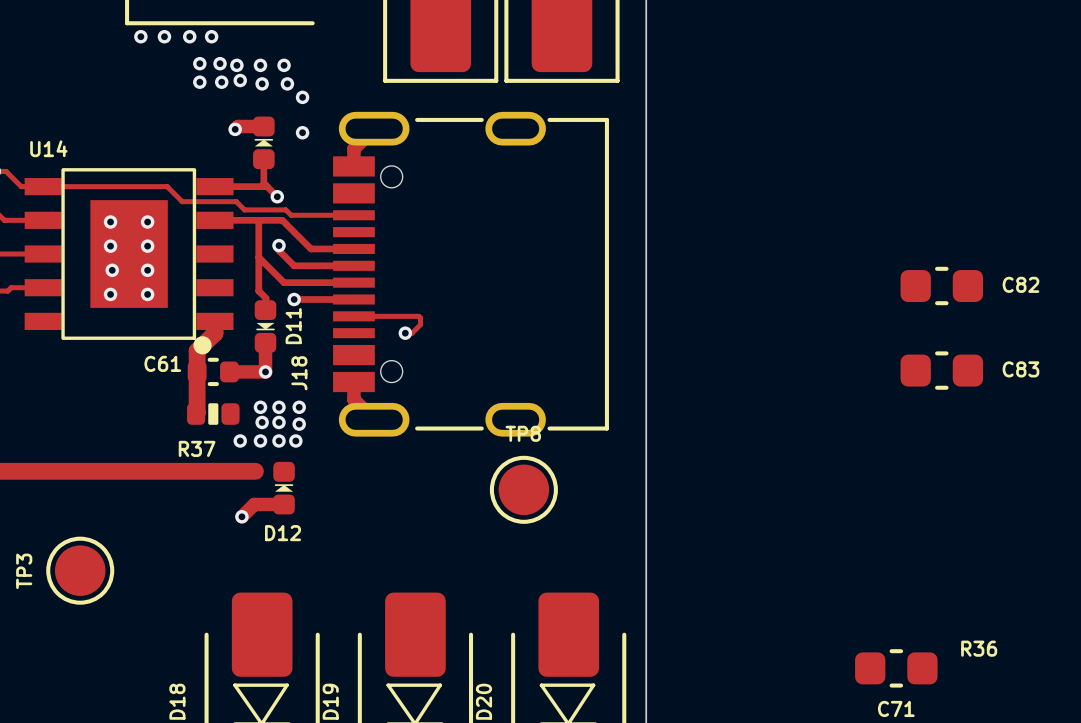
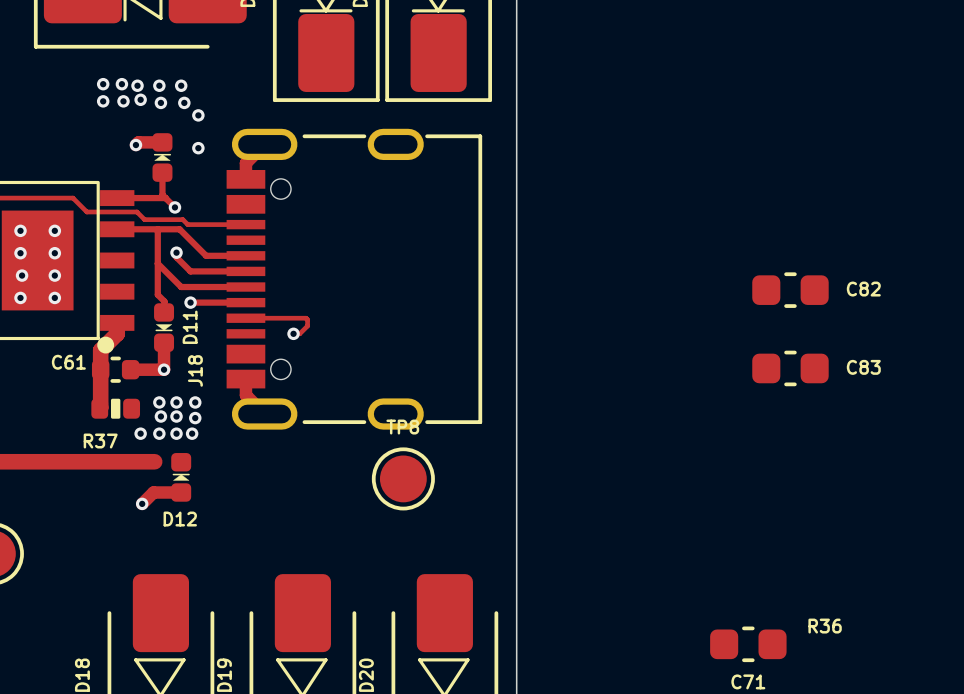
via: (140, 36) -> none
via: (164, 36) -> none
via: (189, 36) -> none
via: (211, 36) -> none

